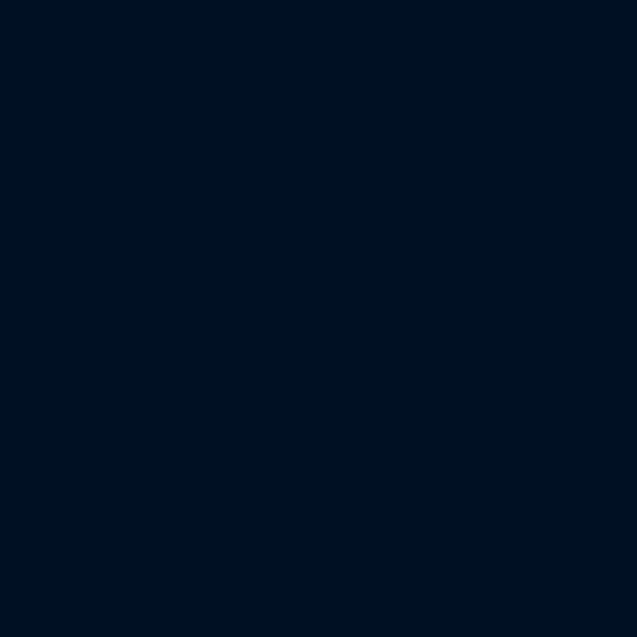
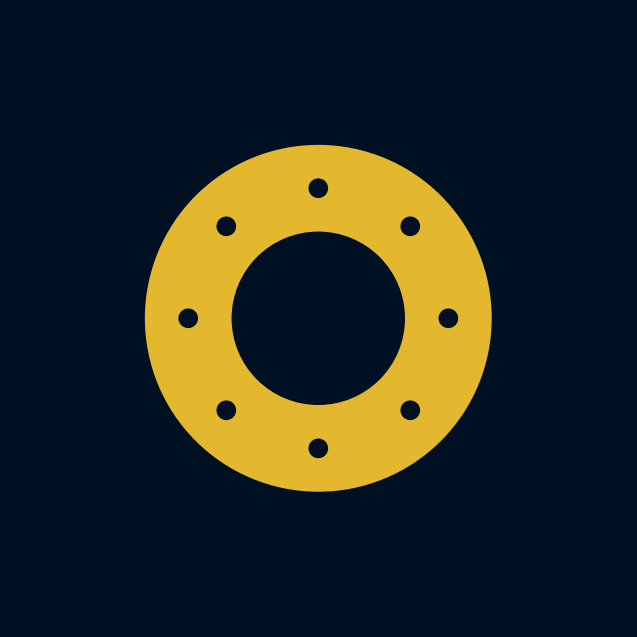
part: none -> (318, 318)

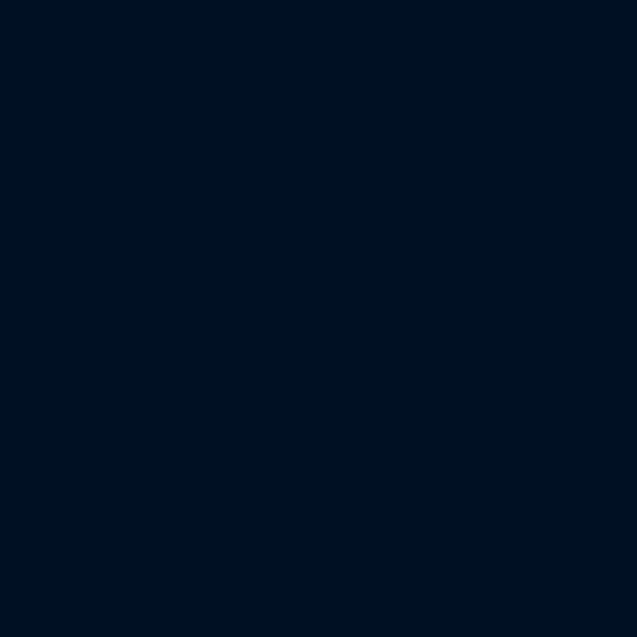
part: (318, 318) -> none

